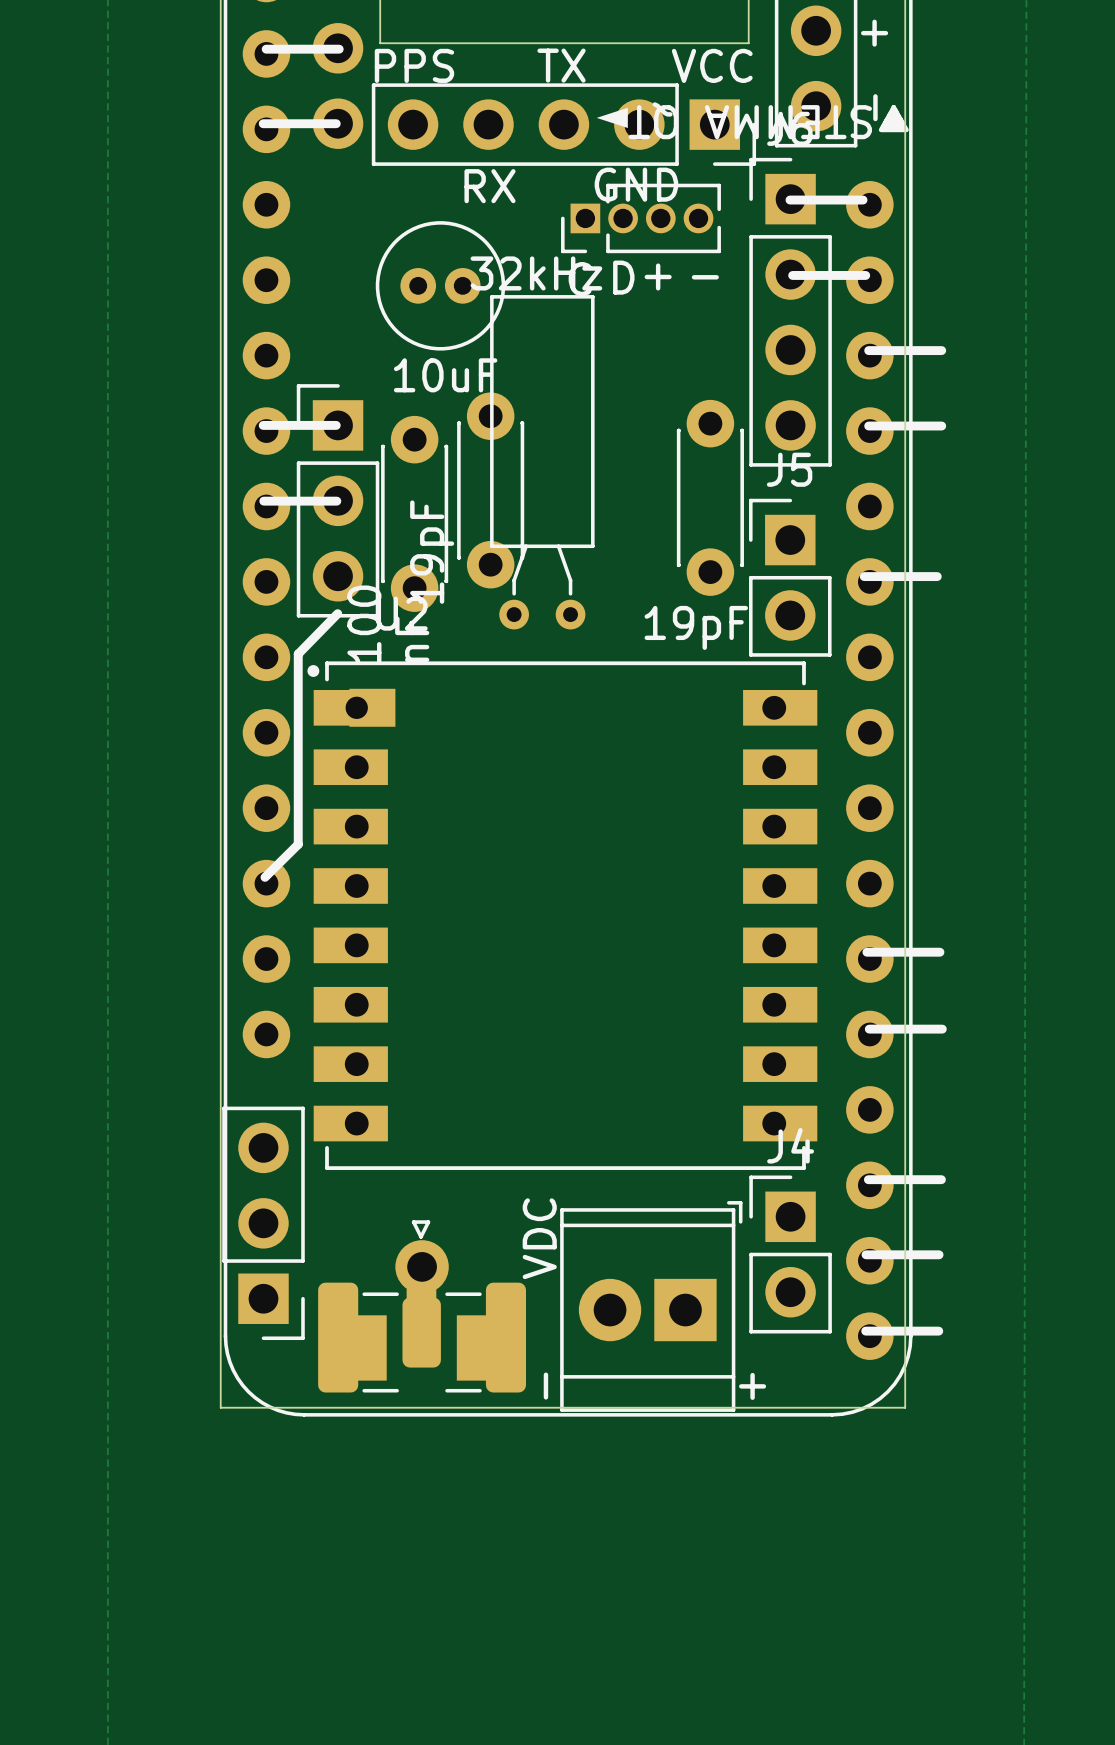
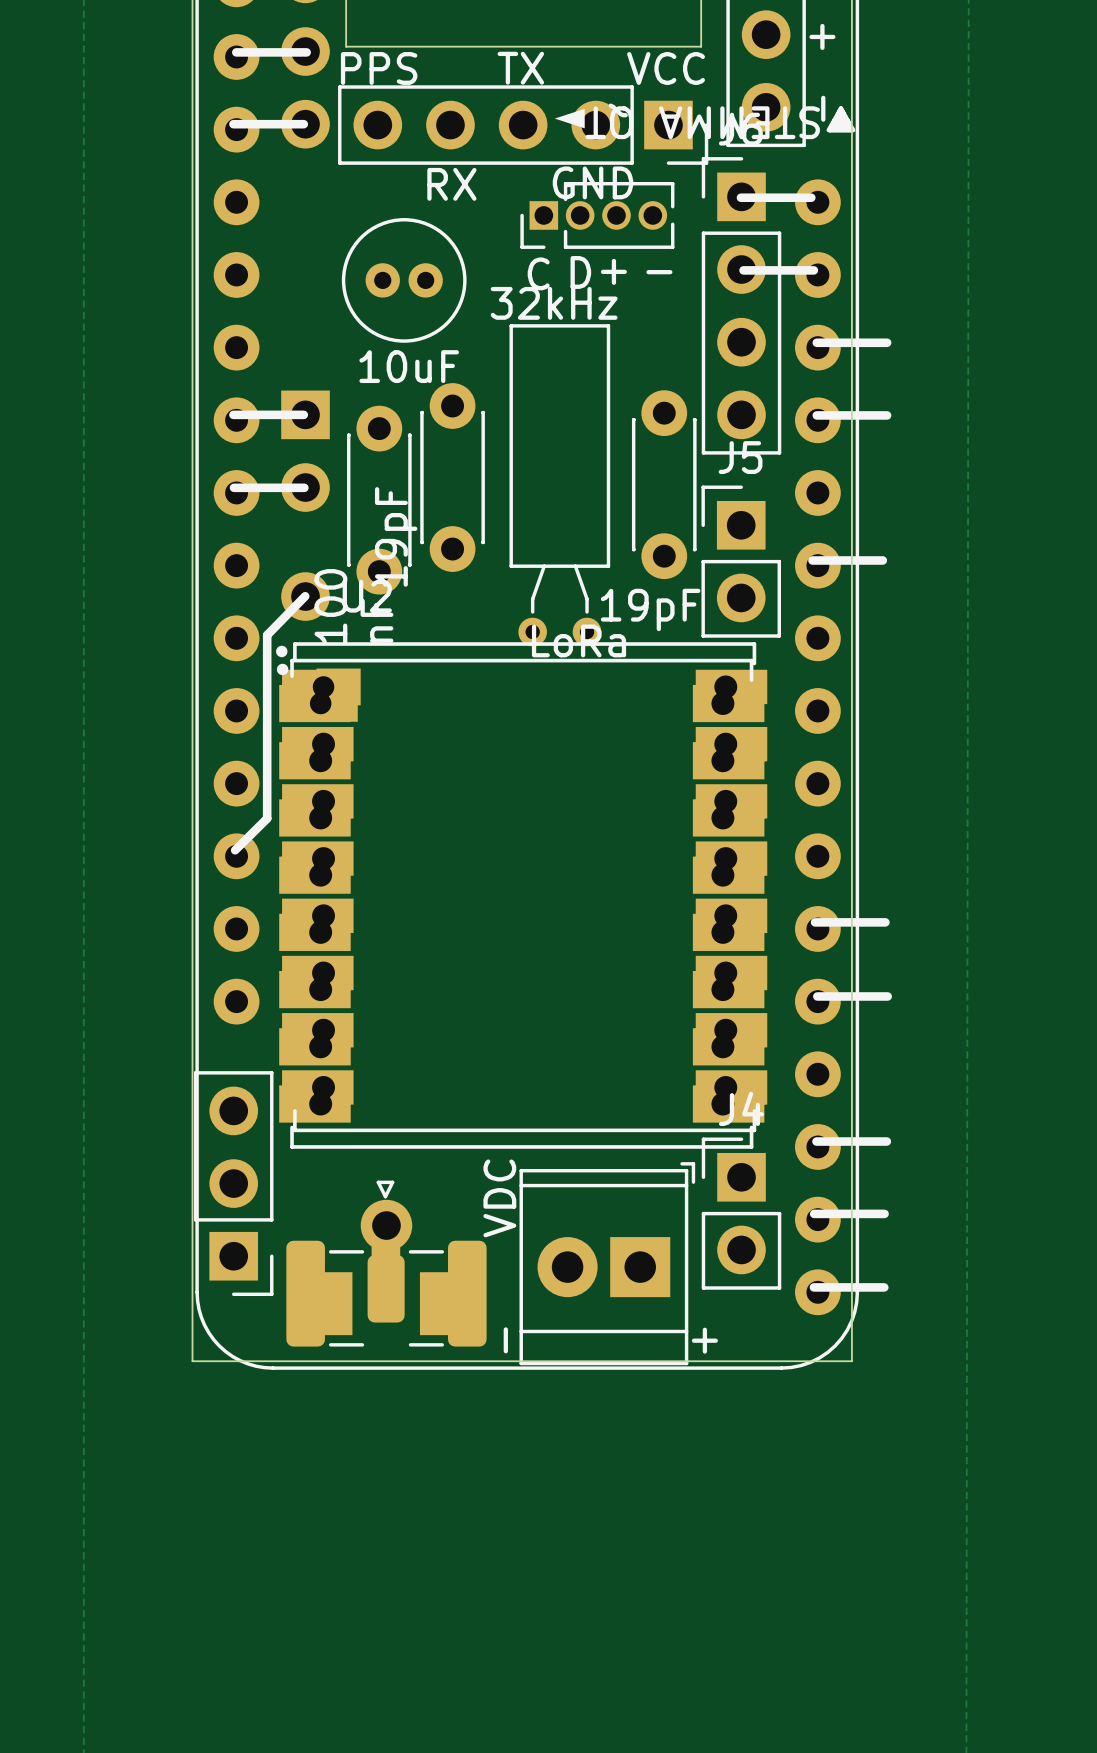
part footprint: [296, 384, 380, 618] -> [281, 390, 330, 621]
part position: (542, 462) -> (559, 485)
part: none -> (520, 903)

